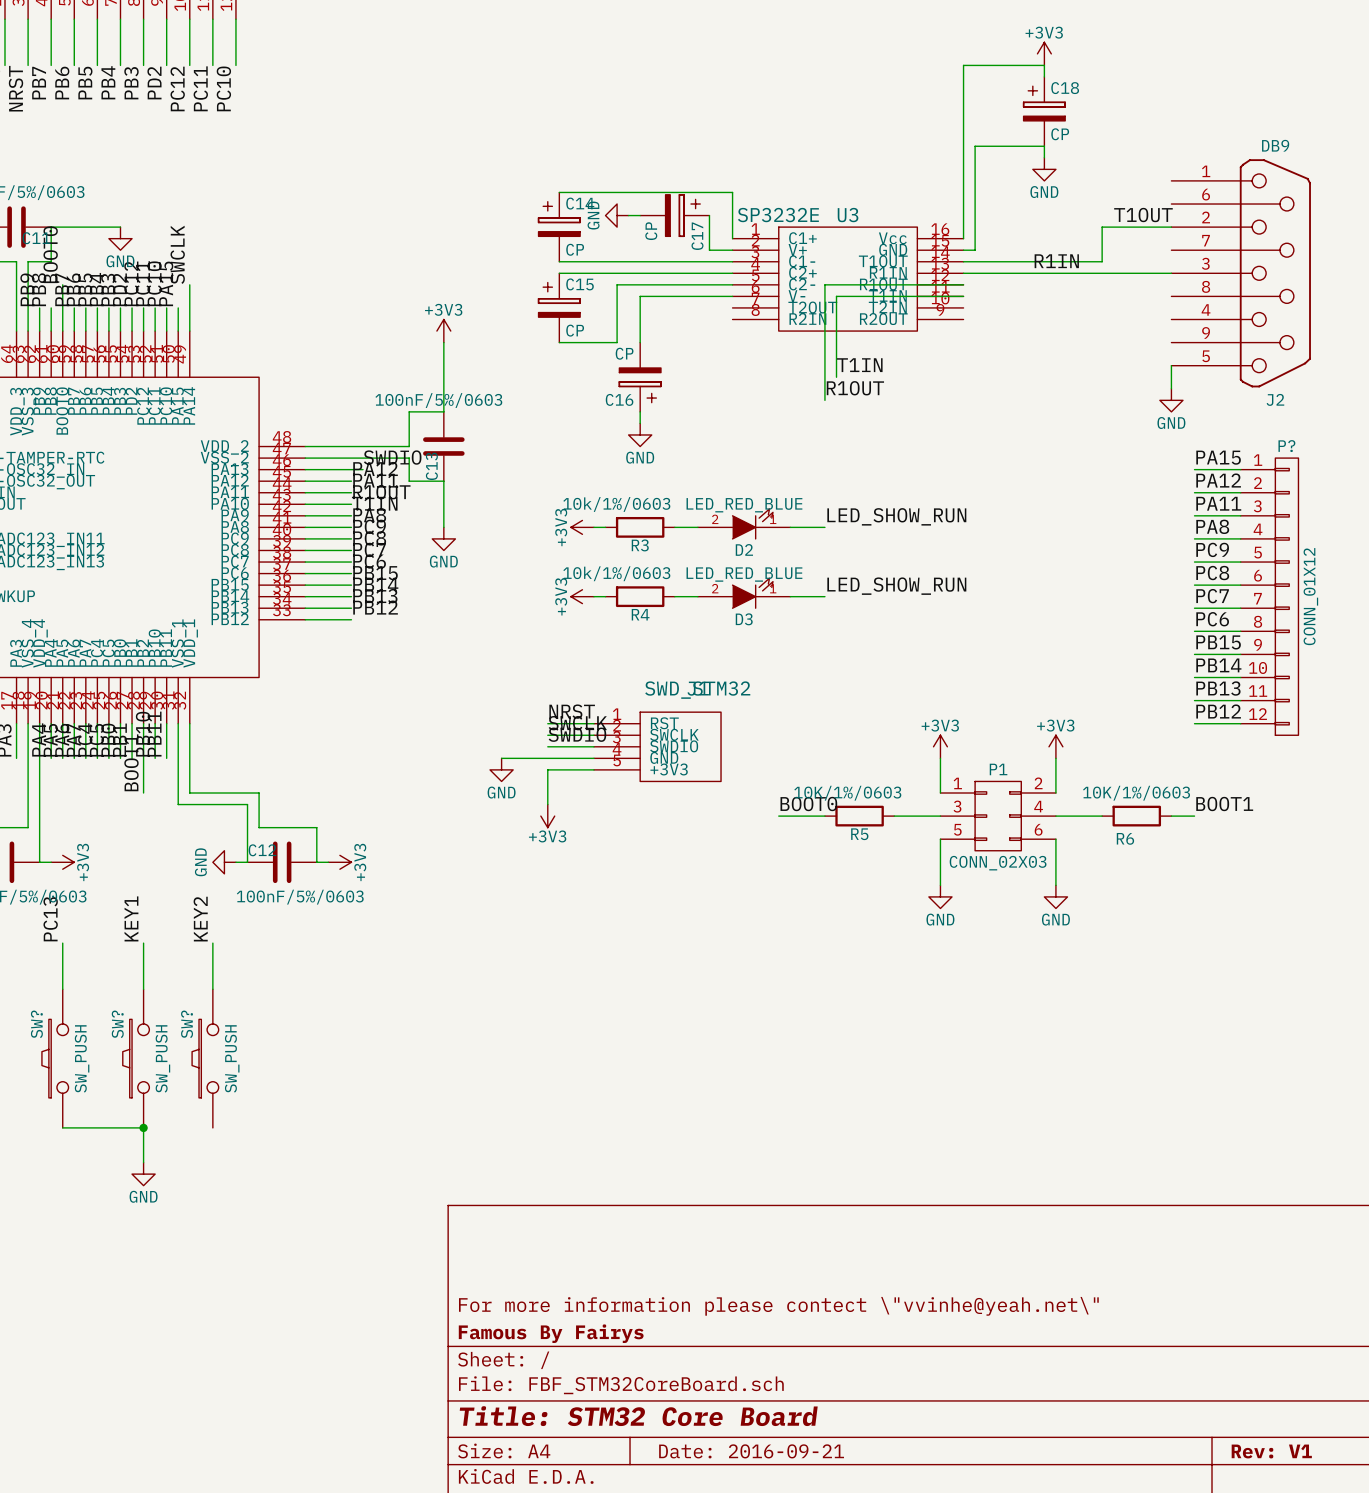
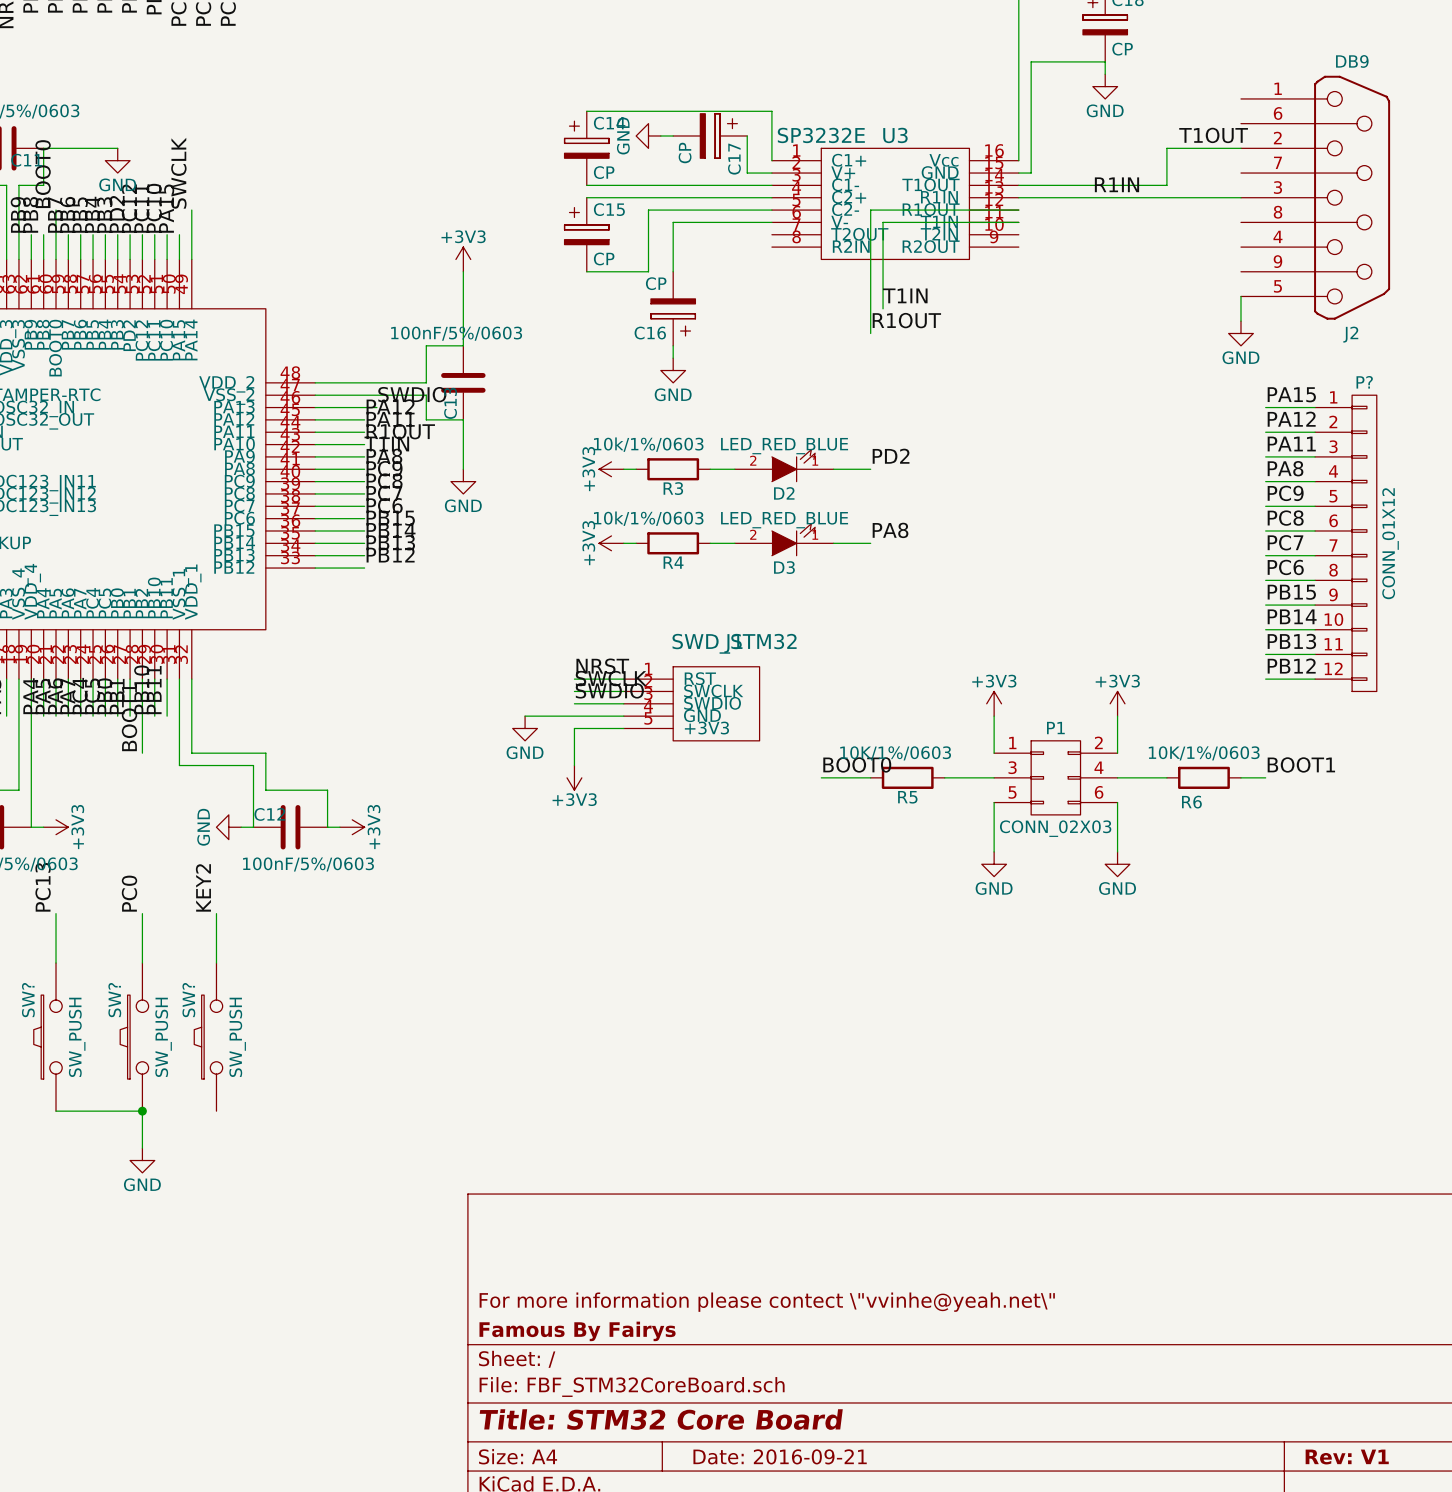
label: LED_SHOW_RUN (896, 516) -> PD2 (891, 456)
label: LED_SHOW_RUN (896, 586) -> PA8 (890, 530)
label: KEY1 (131, 918) -> PC0 (129, 893)

